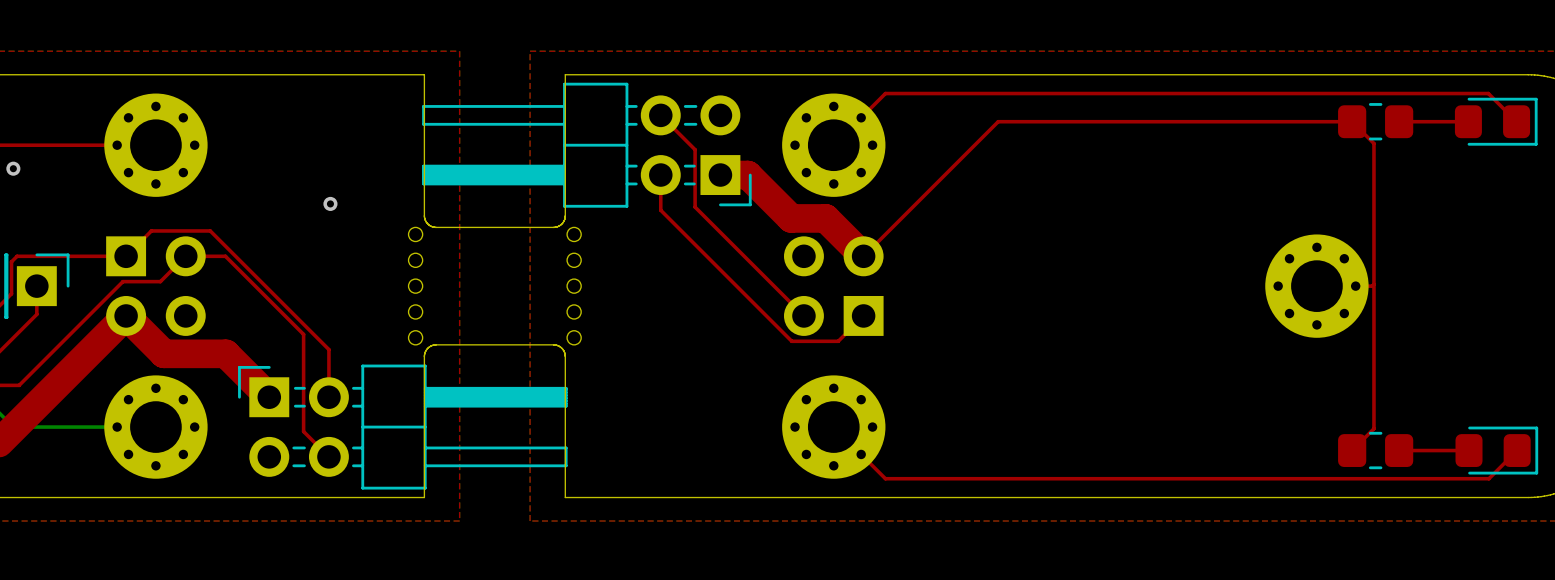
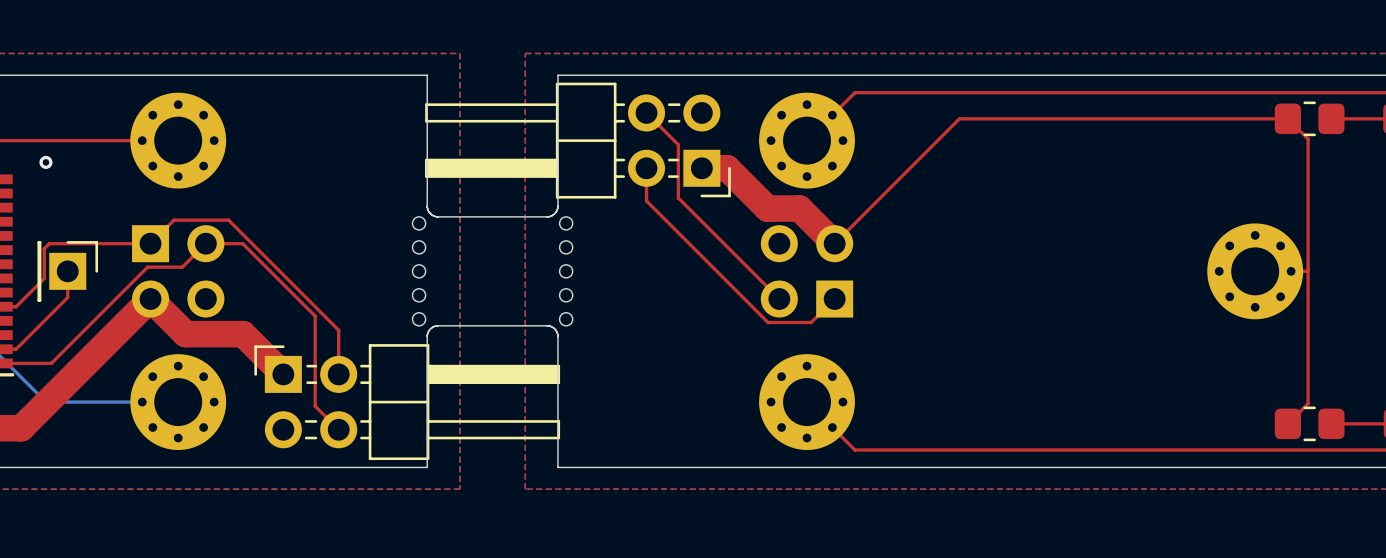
via: (330, 203) -> none

